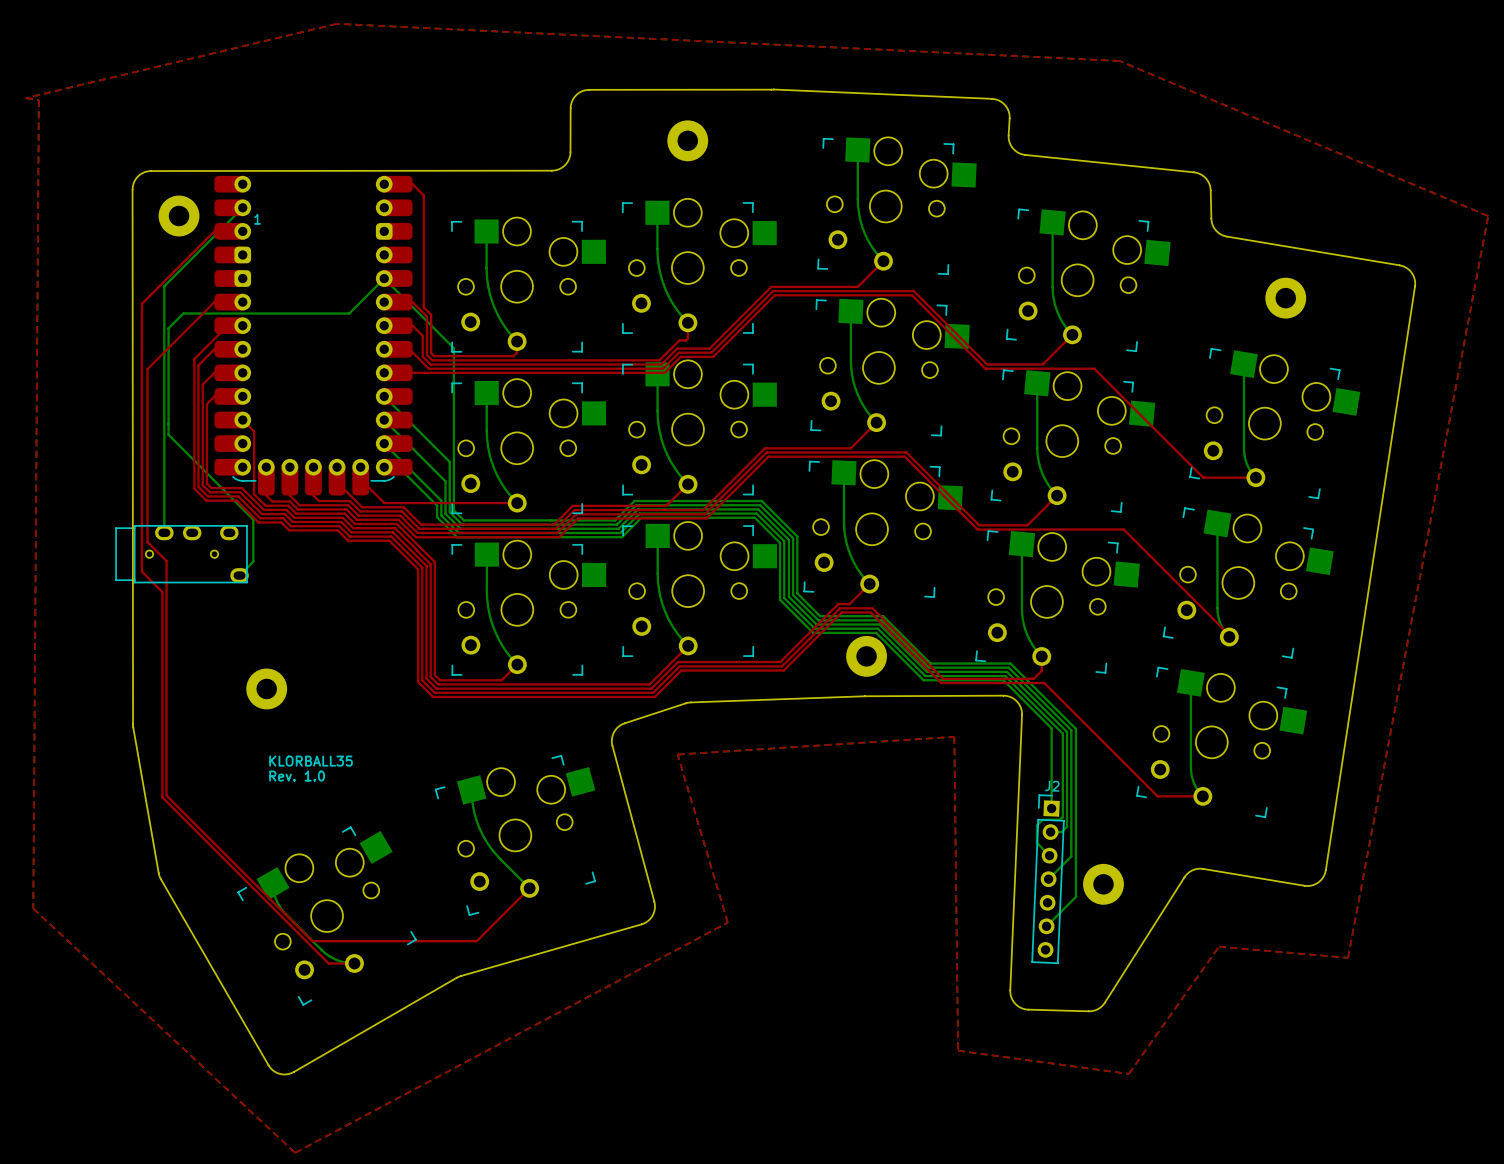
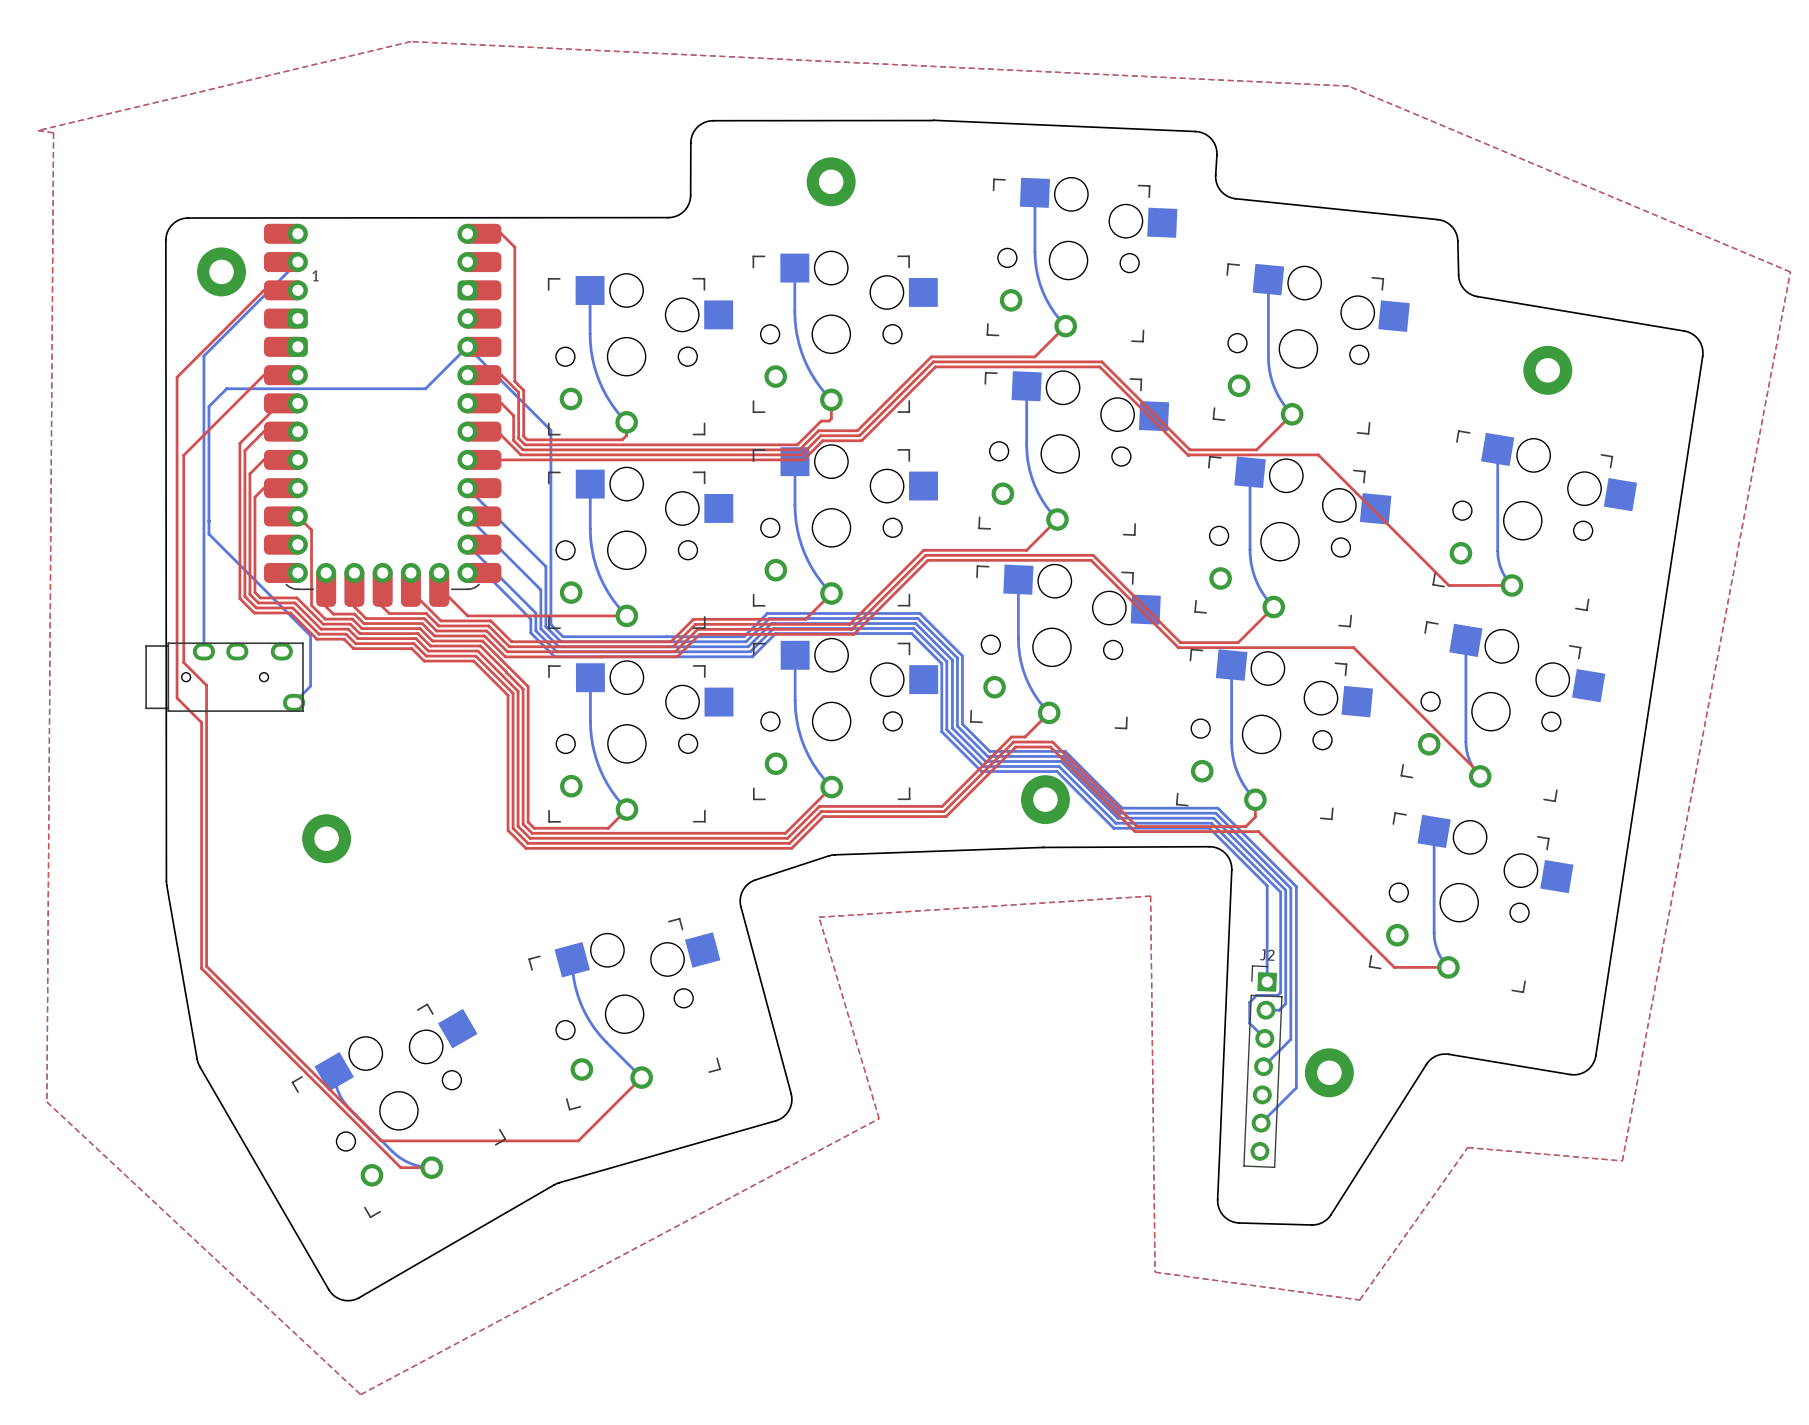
text: KLORBALL35 (311, 761) -> none
text: Rev. 1.0 (297, 776) -> none

